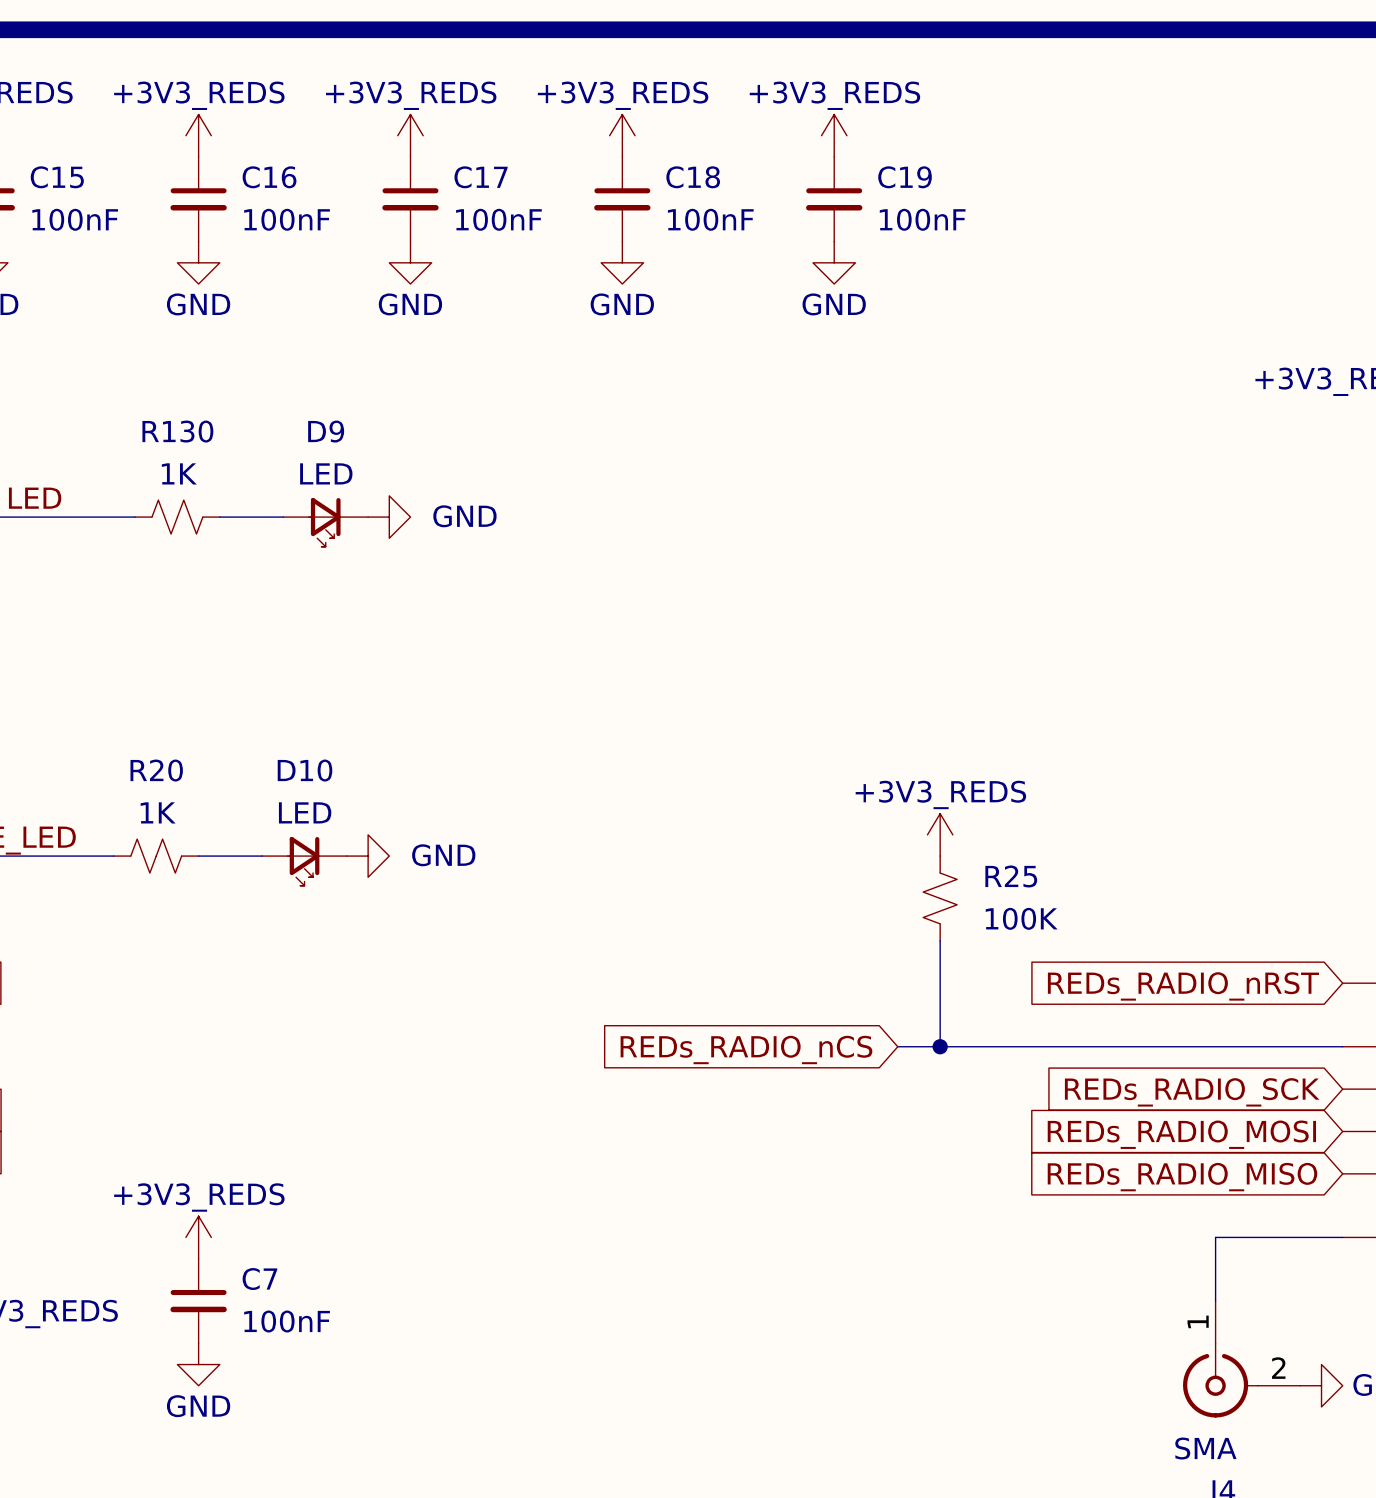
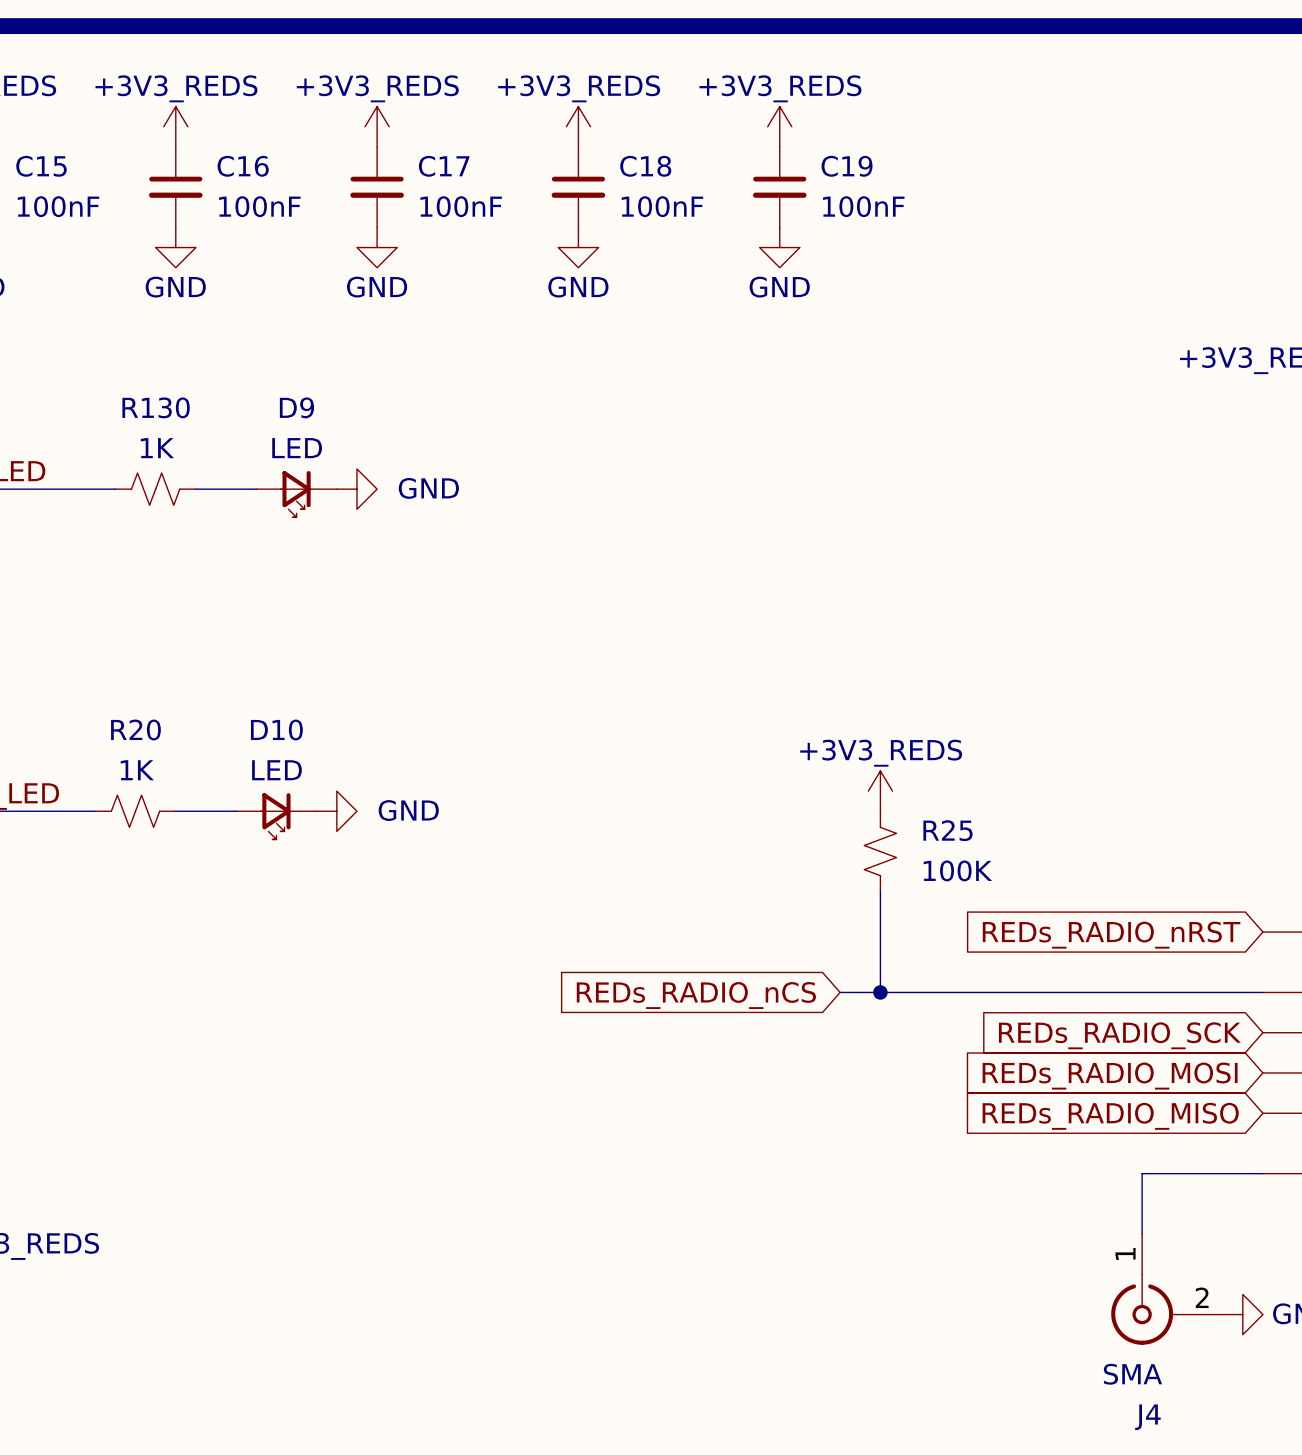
power symbol: +3V3_REDS (198, 1237) -> none
C7: 100nF (198, 1300) -> none
power symbol: GND (198, 1364) -> none

